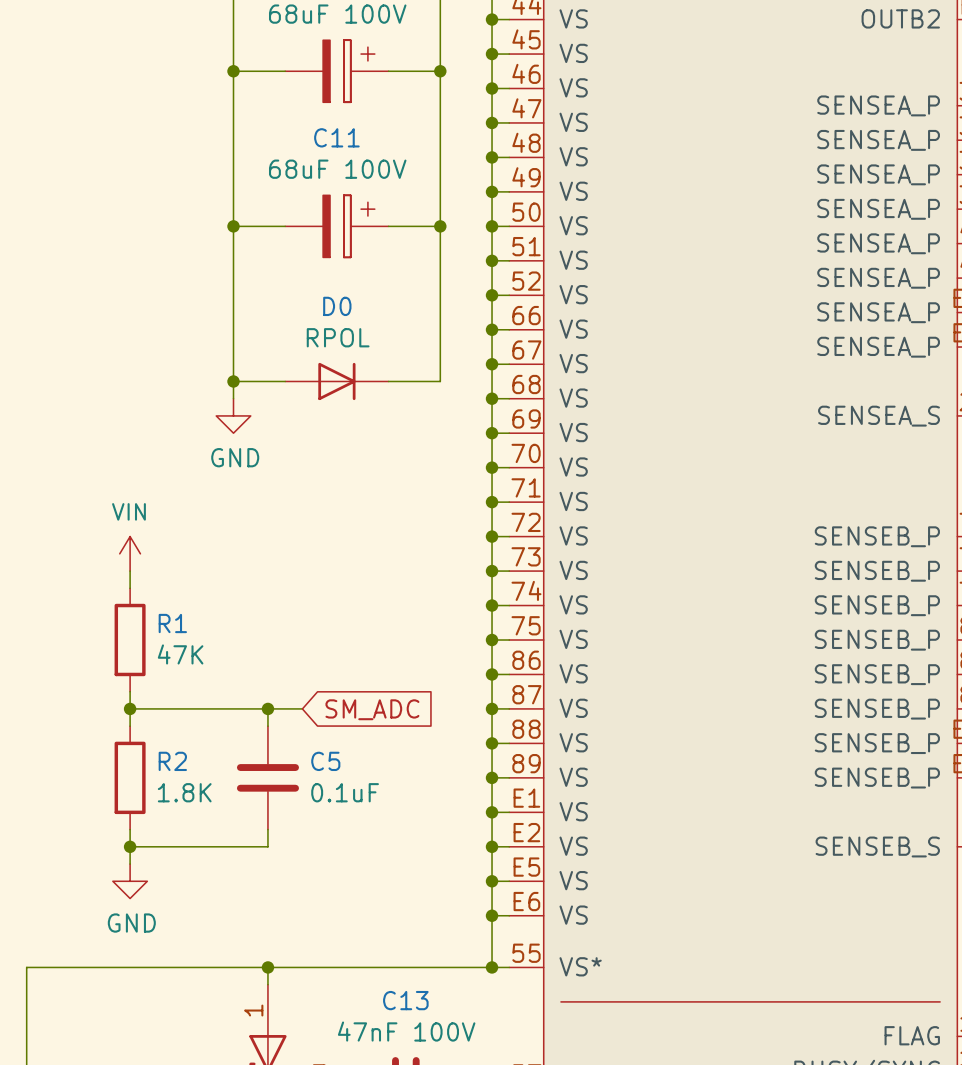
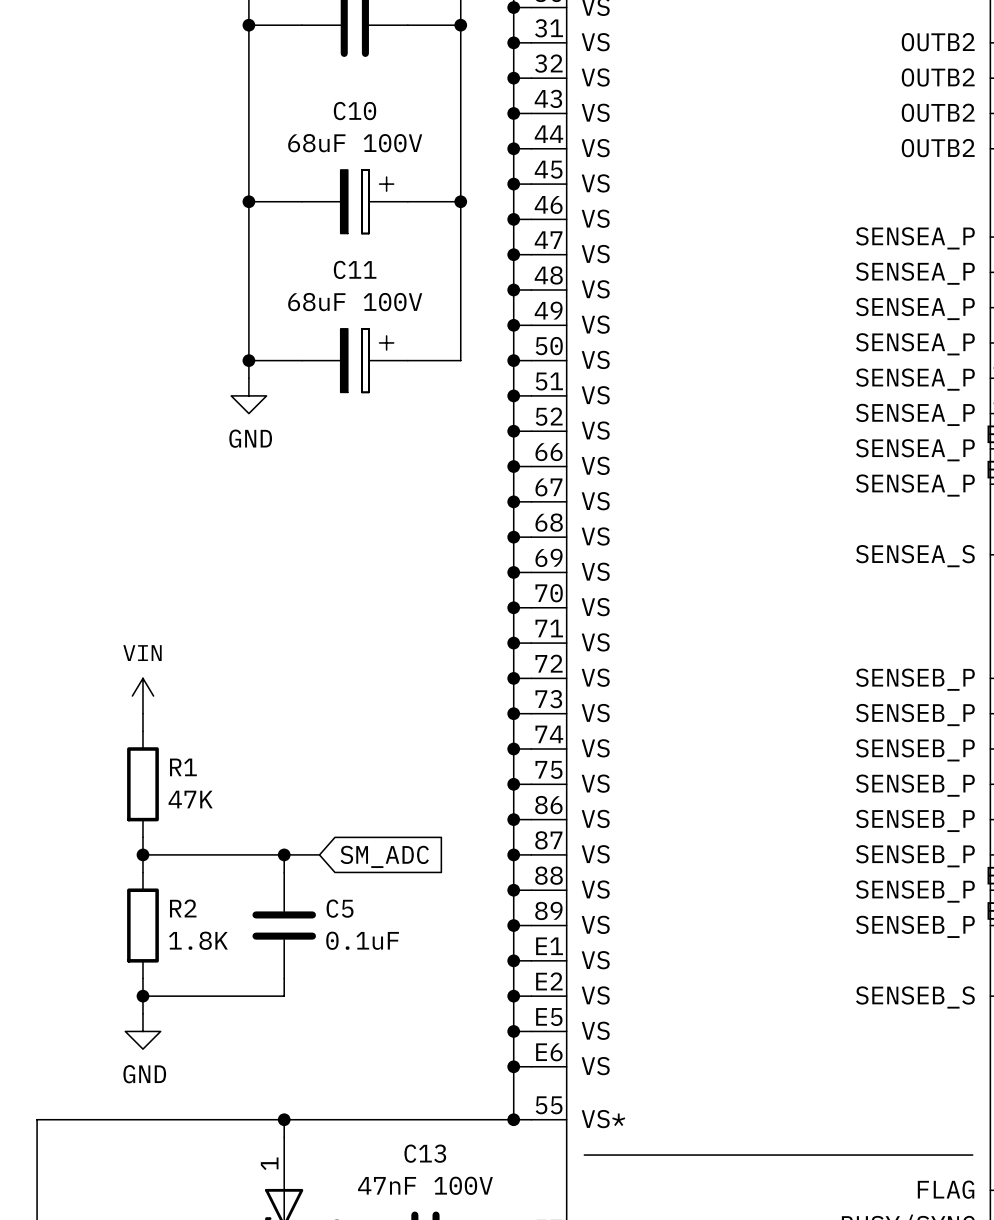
wire: (440, 226) (440, 381) (388, 381) -> none
junction: (440, 226) -> none
wire: (233, 243) (233, 398) -> none
wire: (233, 381) (285, 381) -> none
junction: (233, 381) -> none
D0: RPOL (336, 381) -> none
power symbol position: GND (233, 415) -> GND (248, 395)

